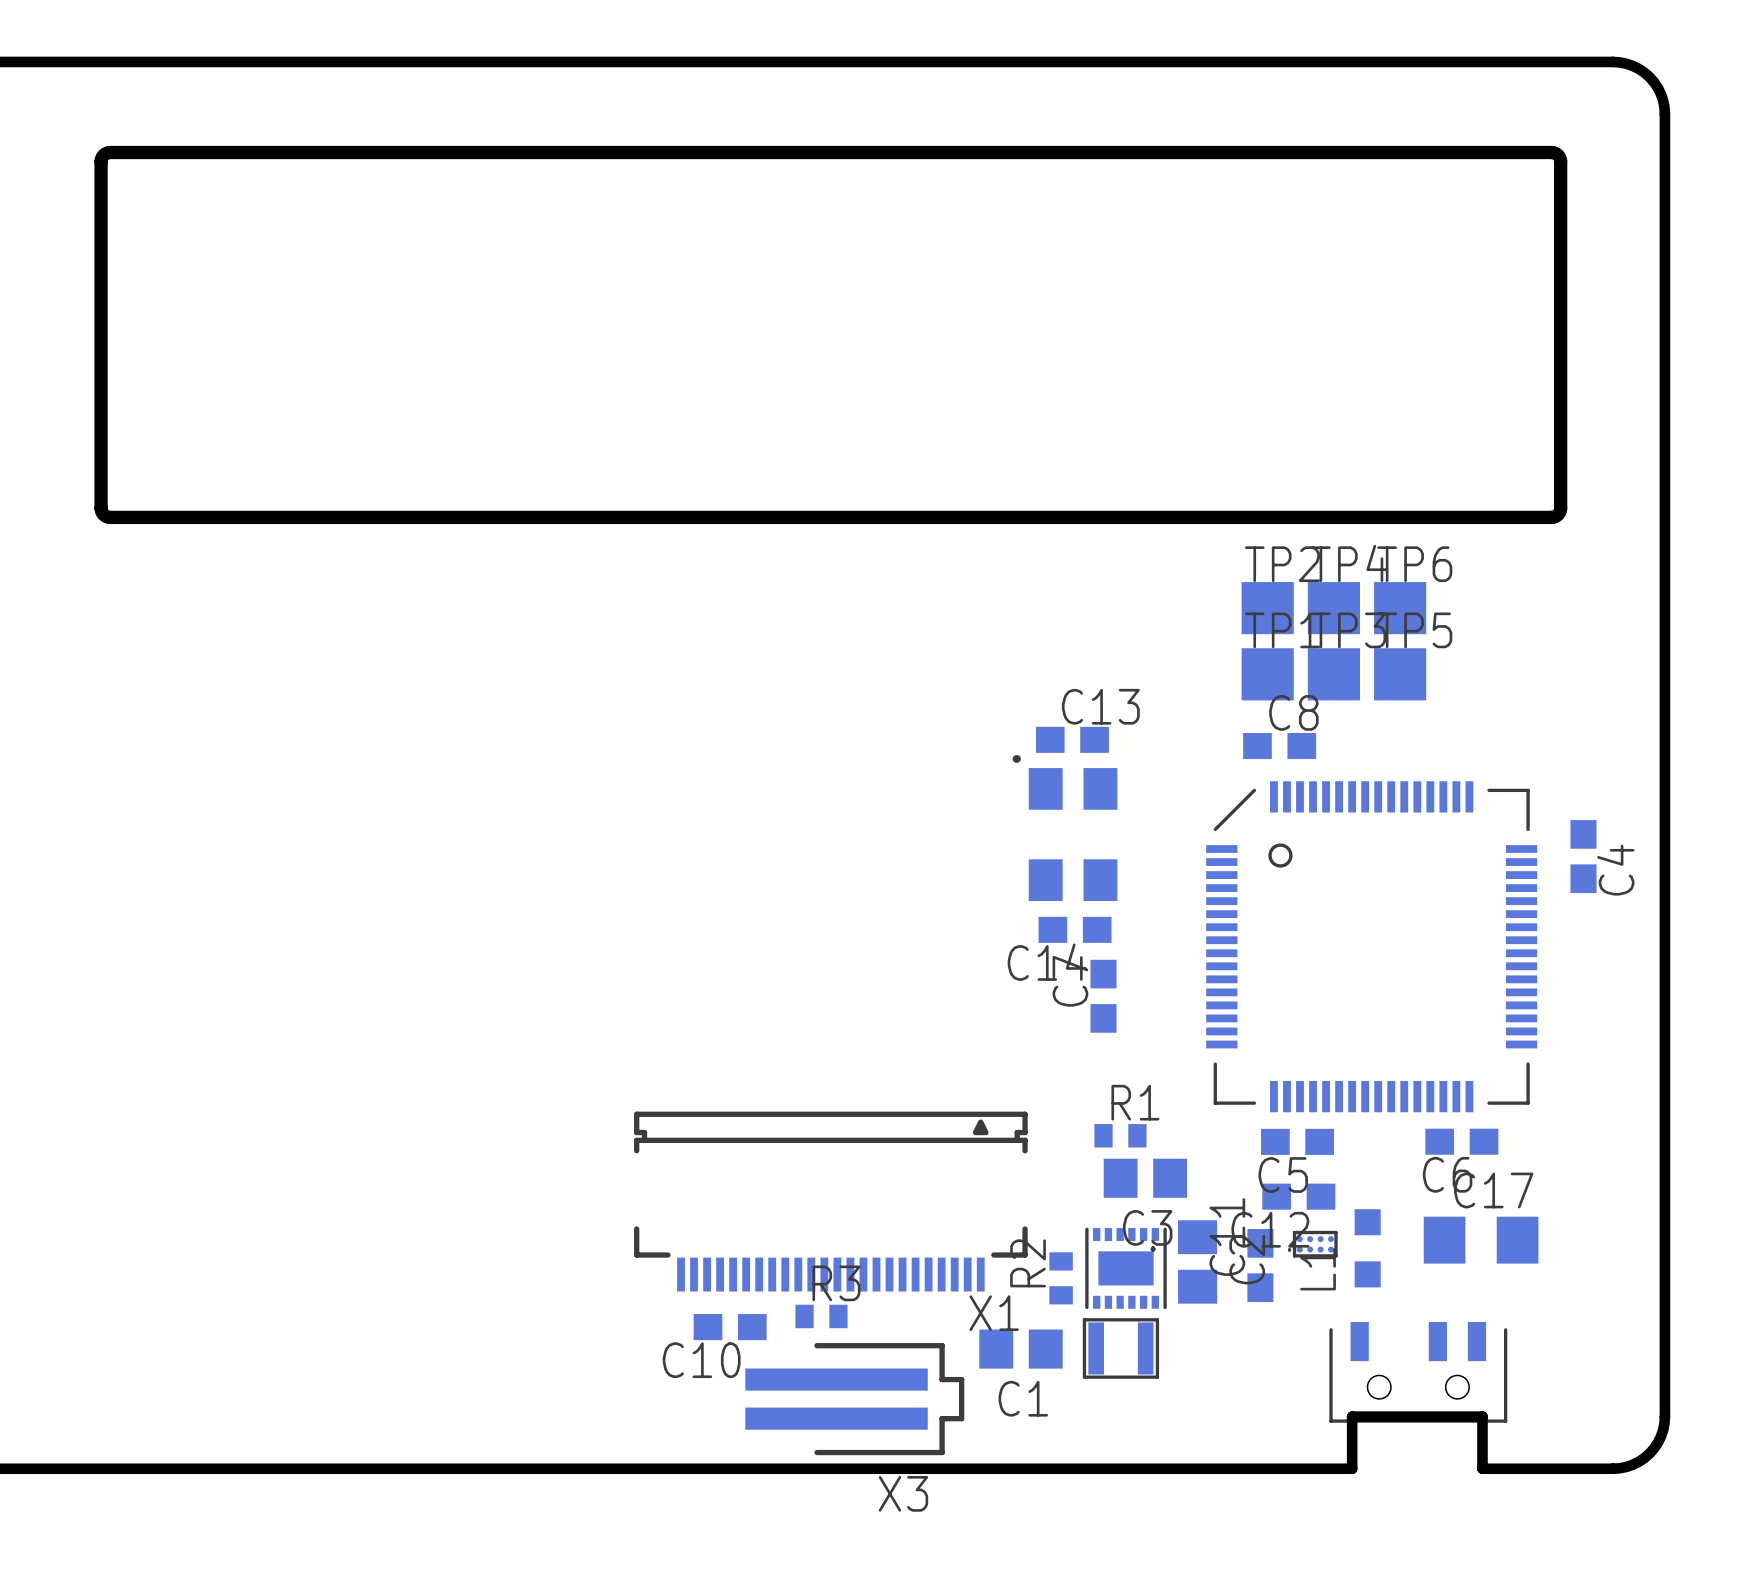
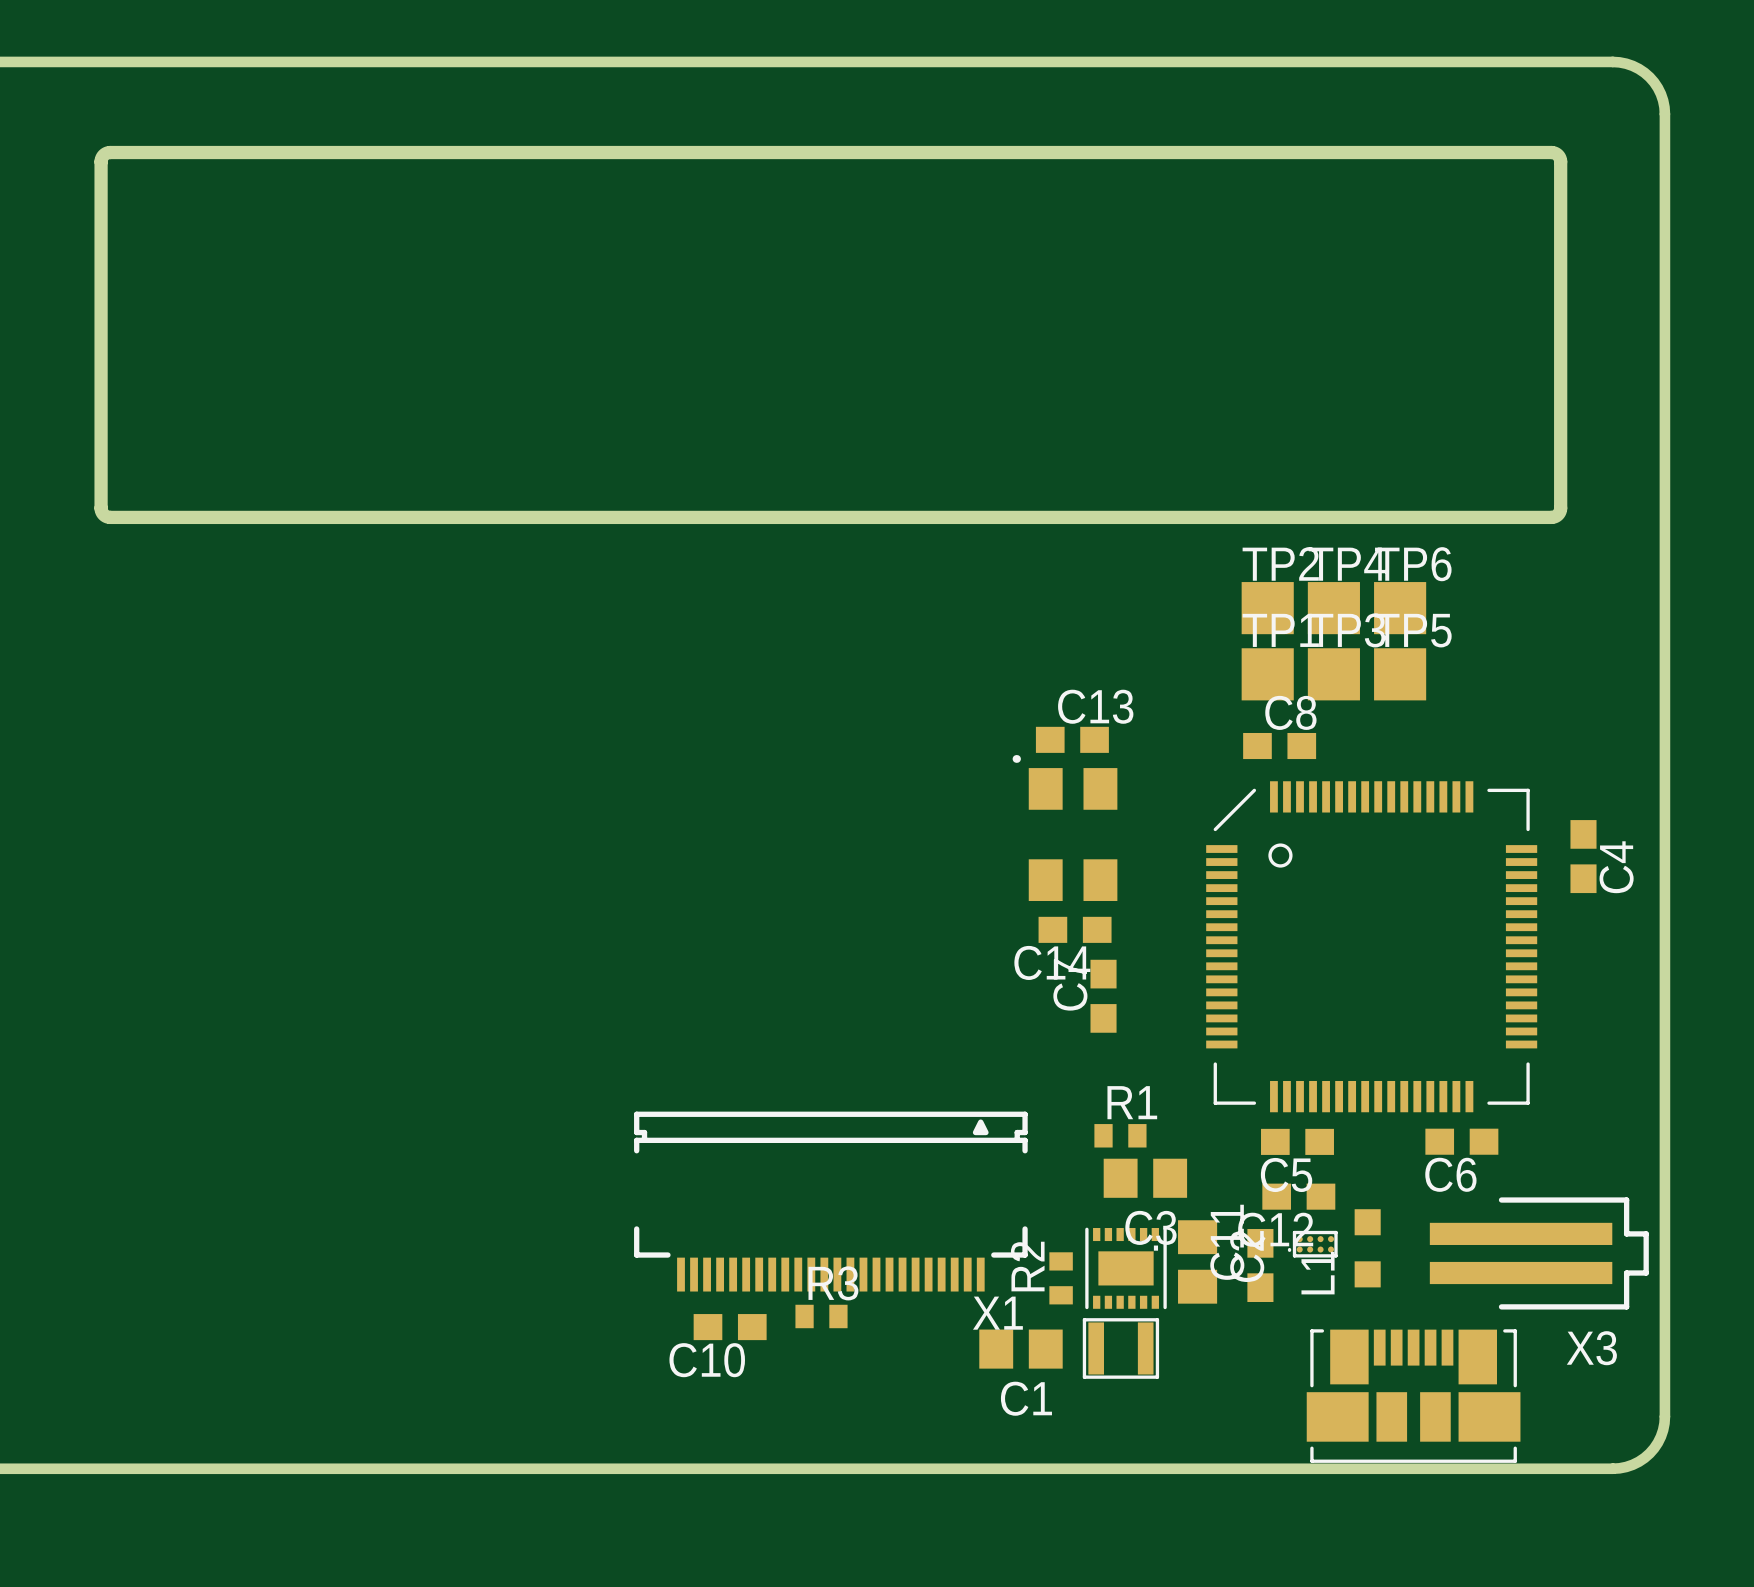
C17: (1481, 1240) -> none
part footprint: [1329, 1322, 1508, 1423] -> [1306, 1329, 1521, 1463]
X3 position: (854, 1399) -> (1539, 1253)
board edge: (1482, 1468) (1482, 1416) (1352, 1416) (1352, 1468) -> (1482, 1468) (1352, 1468)

